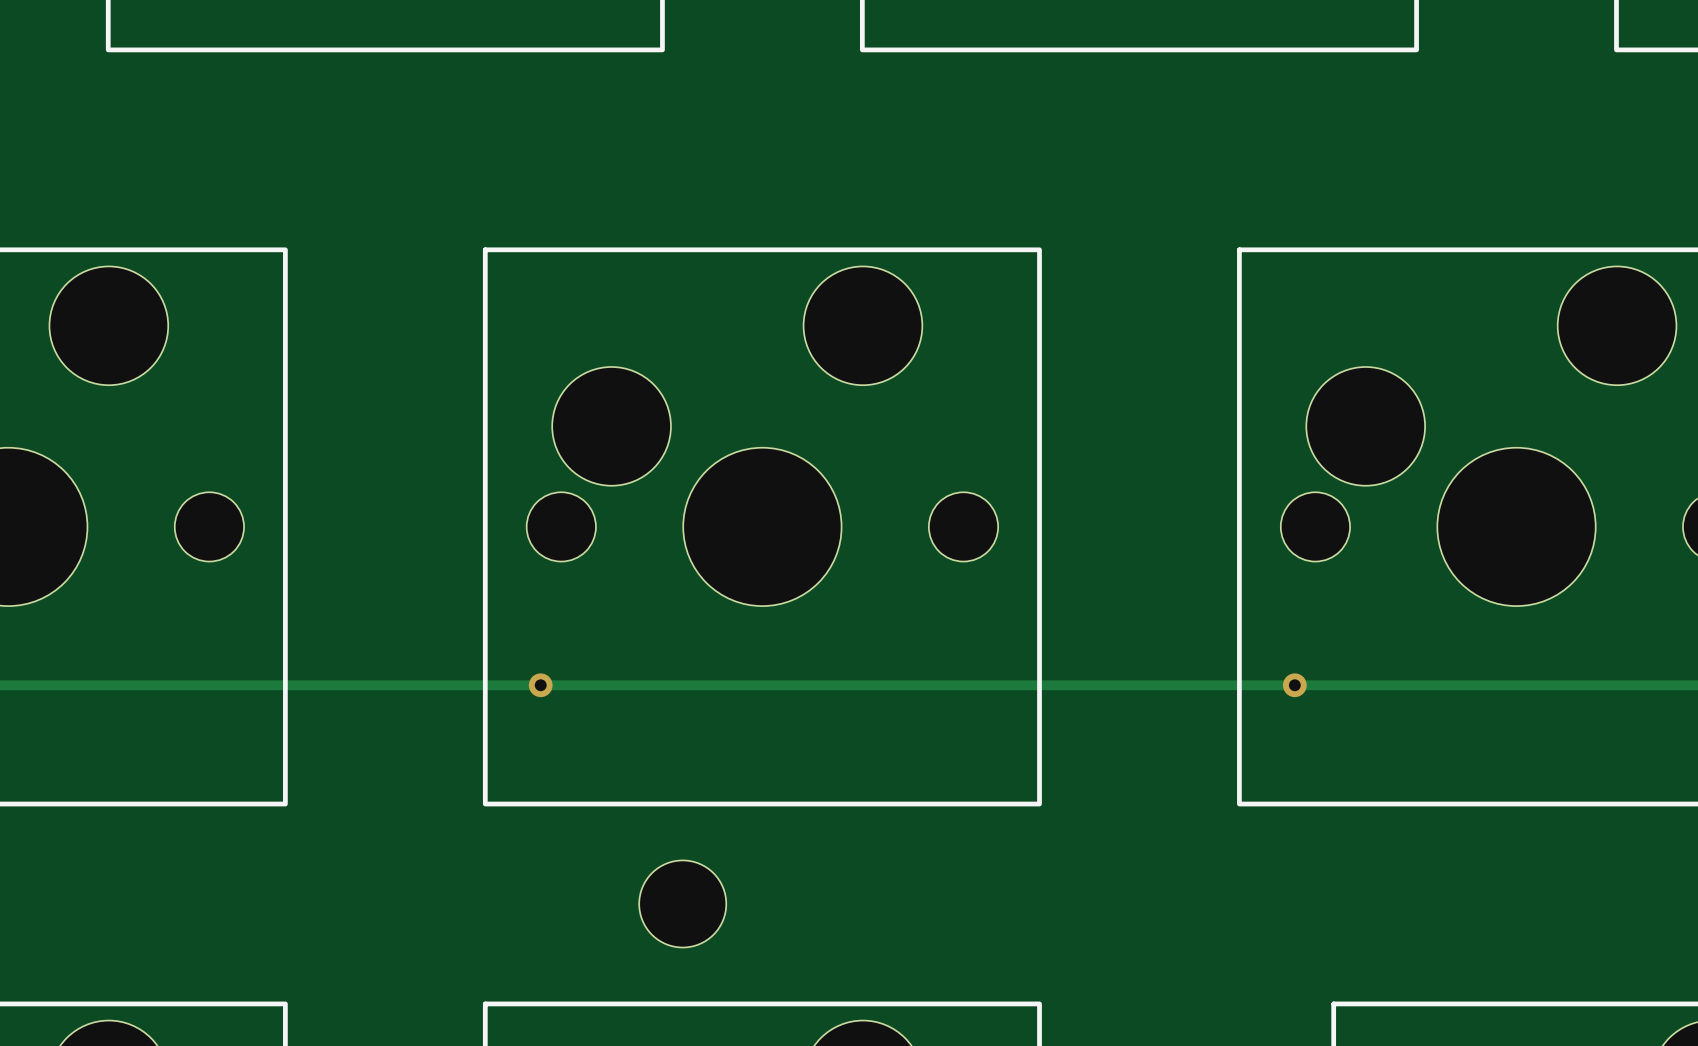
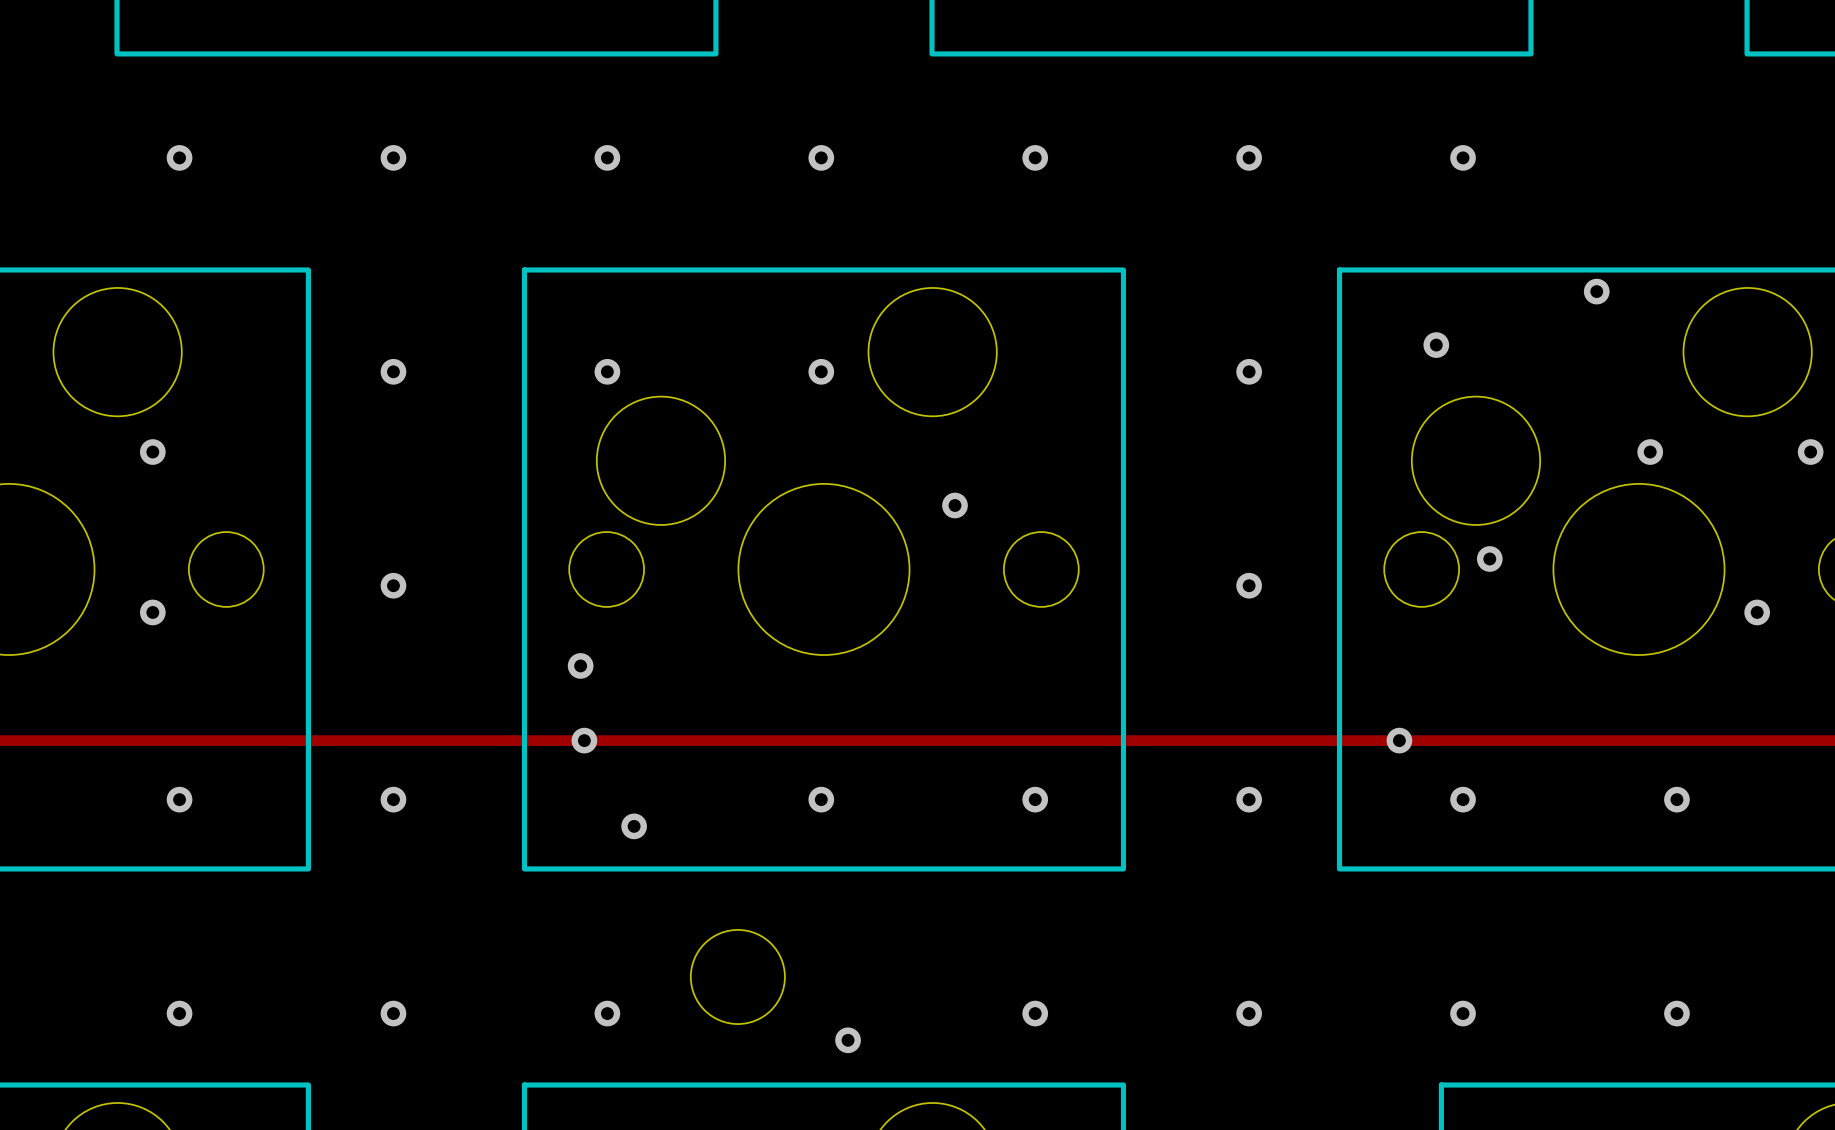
via: none -> (179, 157)
via: none -> (393, 157)
via: none -> (607, 157)
via: none -> (821, 157)
via: none -> (1035, 157)
via: none -> (1249, 157)
via: none -> (1463, 157)
via: none -> (1596, 291)
via: none -> (1436, 345)
via: none -> (393, 371)
via: none -> (607, 371)
via: none -> (821, 371)
via: none -> (1249, 371)
via: none -> (152, 452)
via: none -> (1650, 452)
via: none -> (1810, 452)
via: none -> (954, 505)
via: none -> (1489, 558)
via: none -> (393, 585)
via: none -> (1249, 585)
via: none -> (152, 612)
via: none -> (1757, 612)
via: none -> (580, 665)
via: none -> (179, 799)
via: none -> (393, 799)
via: none -> (821, 799)
via: none -> (1035, 799)
via: none -> (1249, 799)
via: none -> (1463, 799)
via: none -> (1676, 799)
via: none -> (634, 826)
via: none -> (179, 1013)
via: none -> (393, 1013)
via: none -> (607, 1013)
via: none -> (1035, 1013)
via: none -> (1249, 1013)
via: none -> (1463, 1013)
via: none -> (1676, 1013)
via: none -> (848, 1040)

